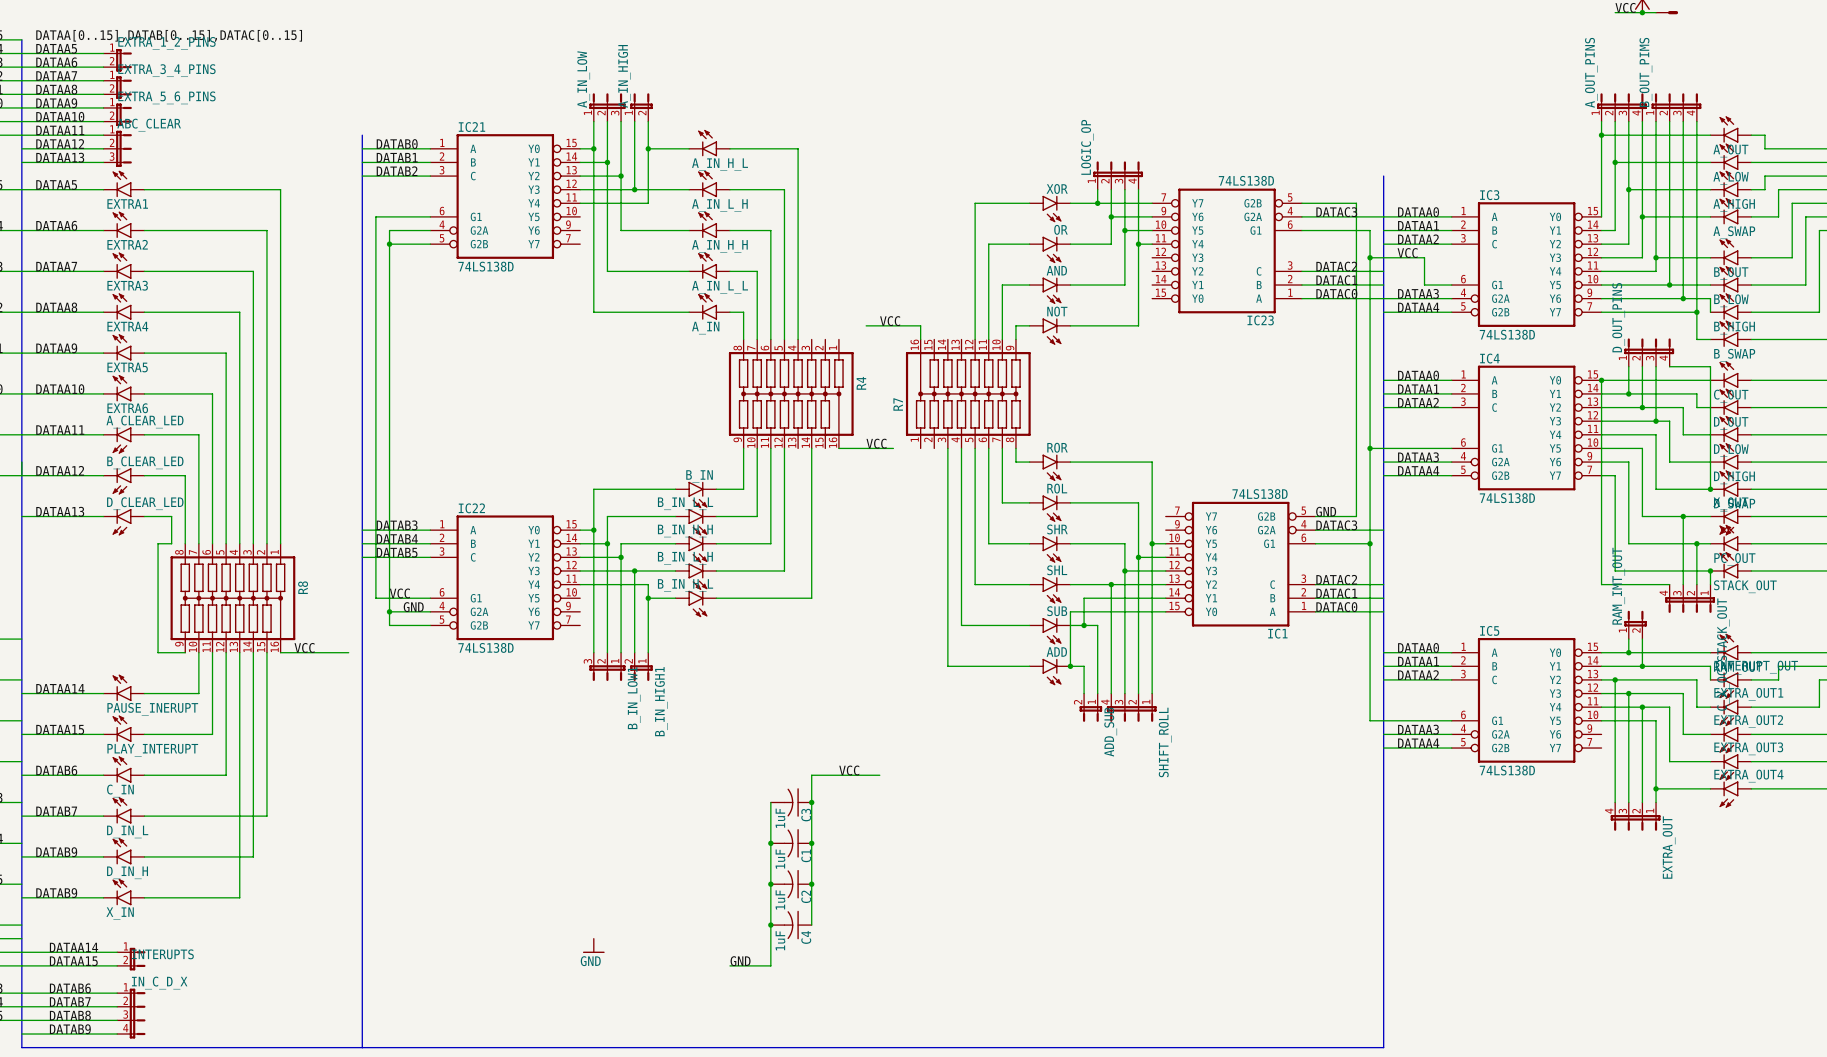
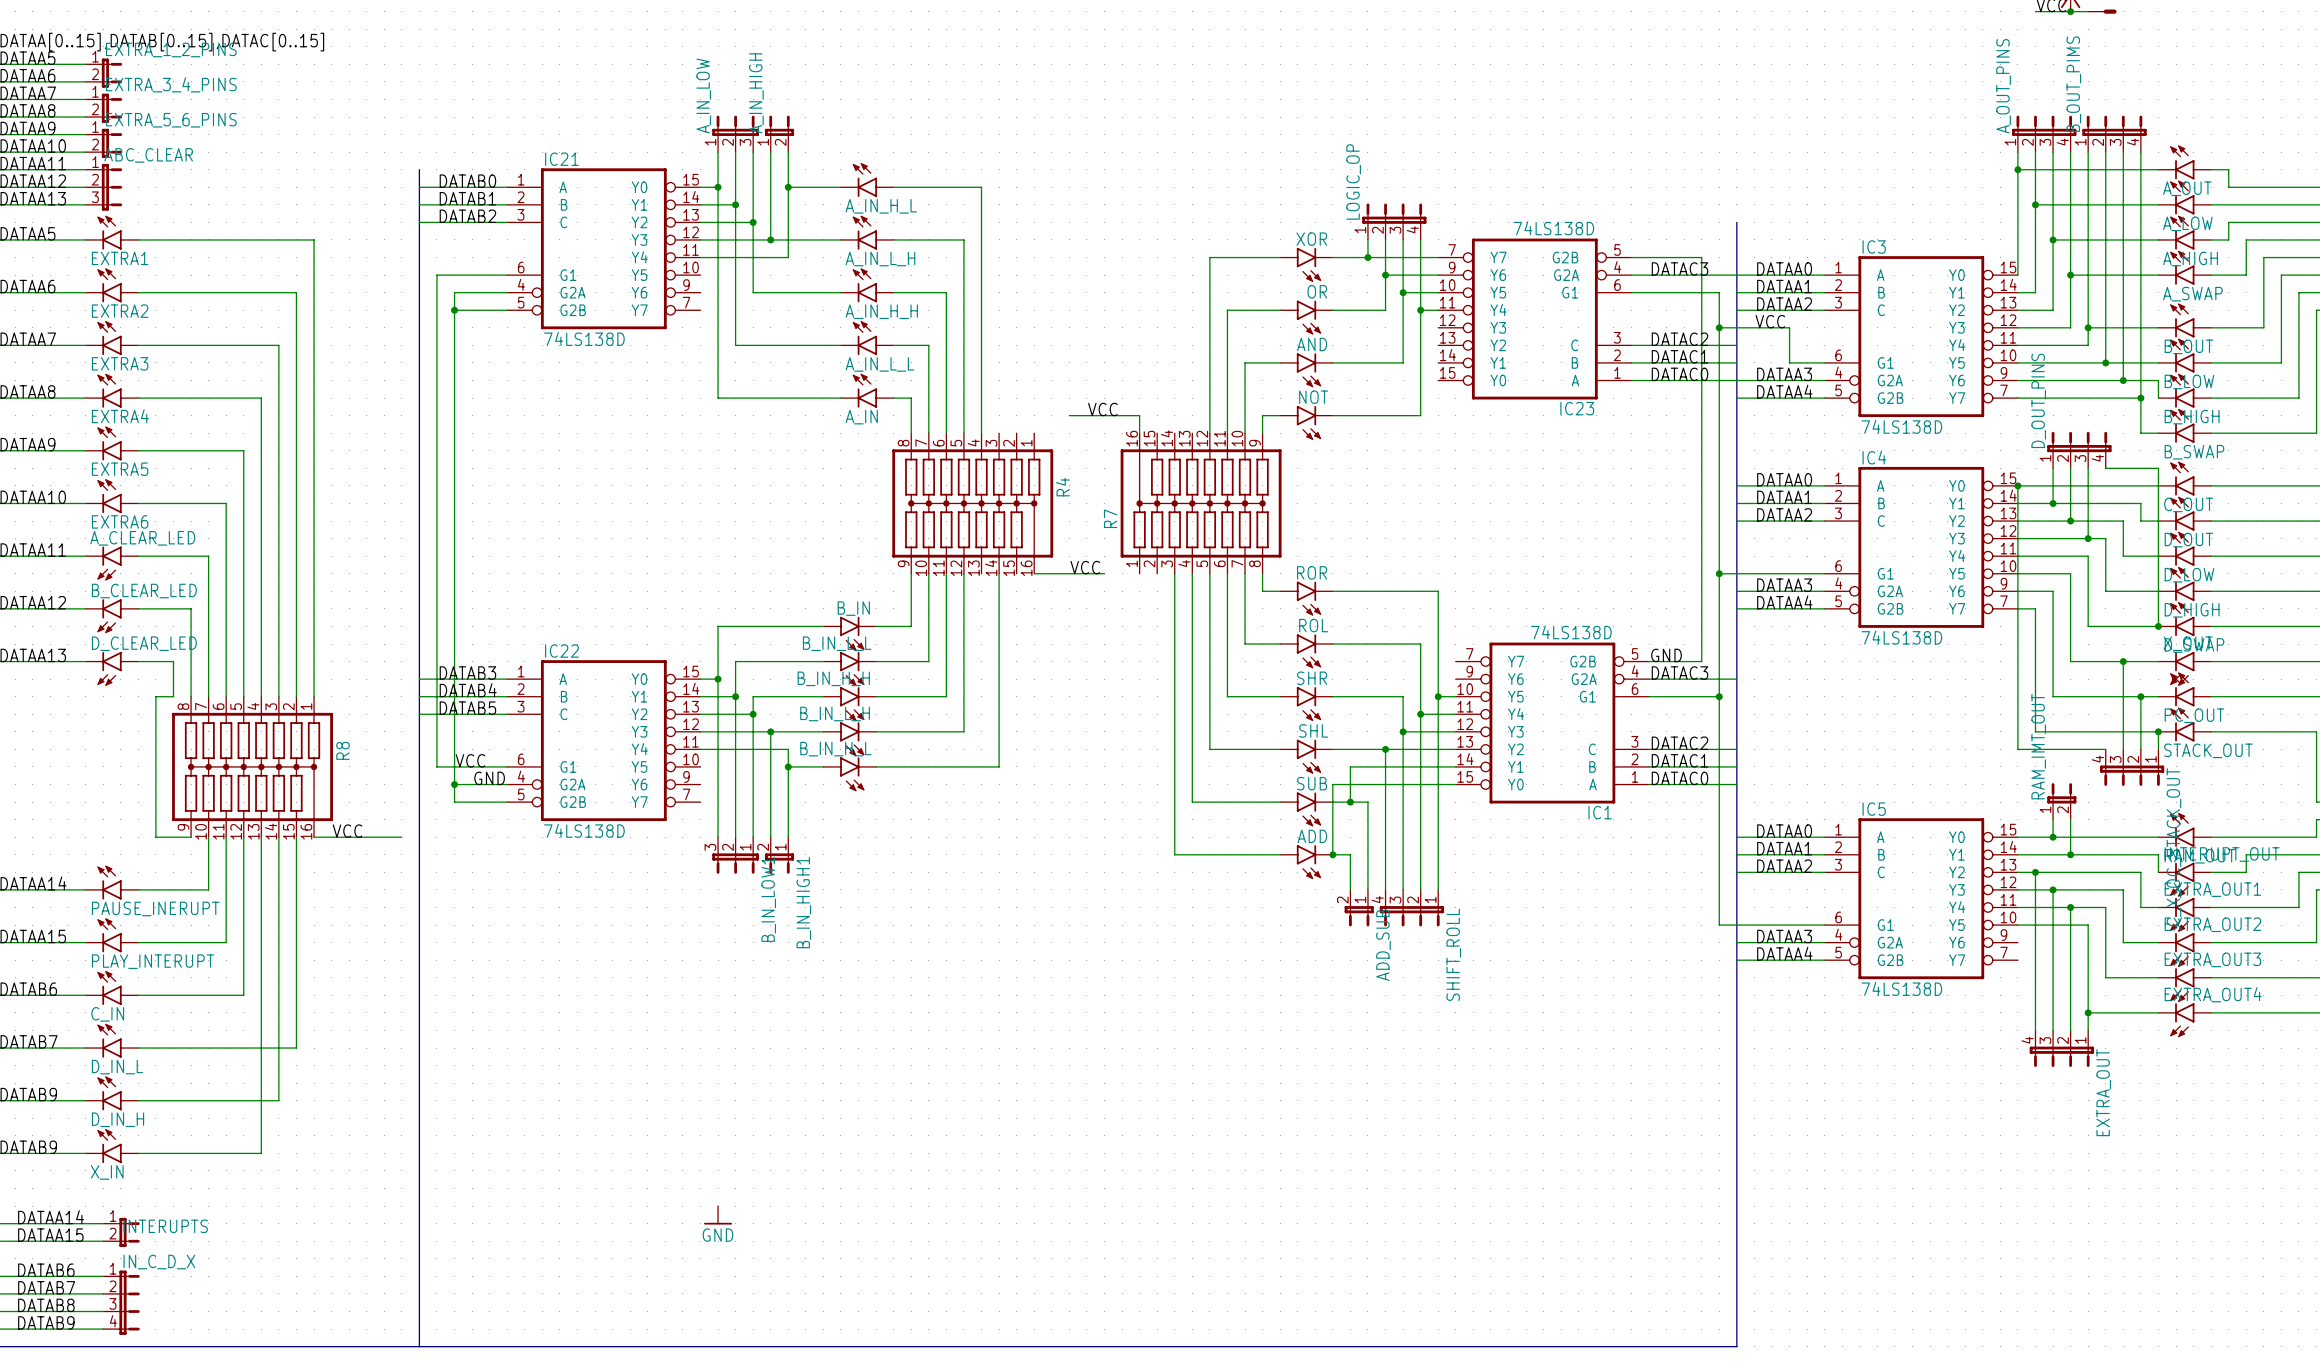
label: VCC (849, 770) -> none
wire: (879, 775) (811, 775) (811, 925) -> none
wire: (770, 802) (770, 965) (729, 965) -> none
C3: 1uF (791, 802) -> none
junction: (811, 802) -> none
junction: (770, 843) -> none
C1: 1uF (791, 843) -> none
junction: (811, 843) -> none
junction: (770, 884) -> none
C2: 1uF (791, 884) -> none
junction: (811, 884) -> none
junction: (770, 925) -> none
C4: 1uF (791, 925) -> none
label: GND (740, 961) -> none

